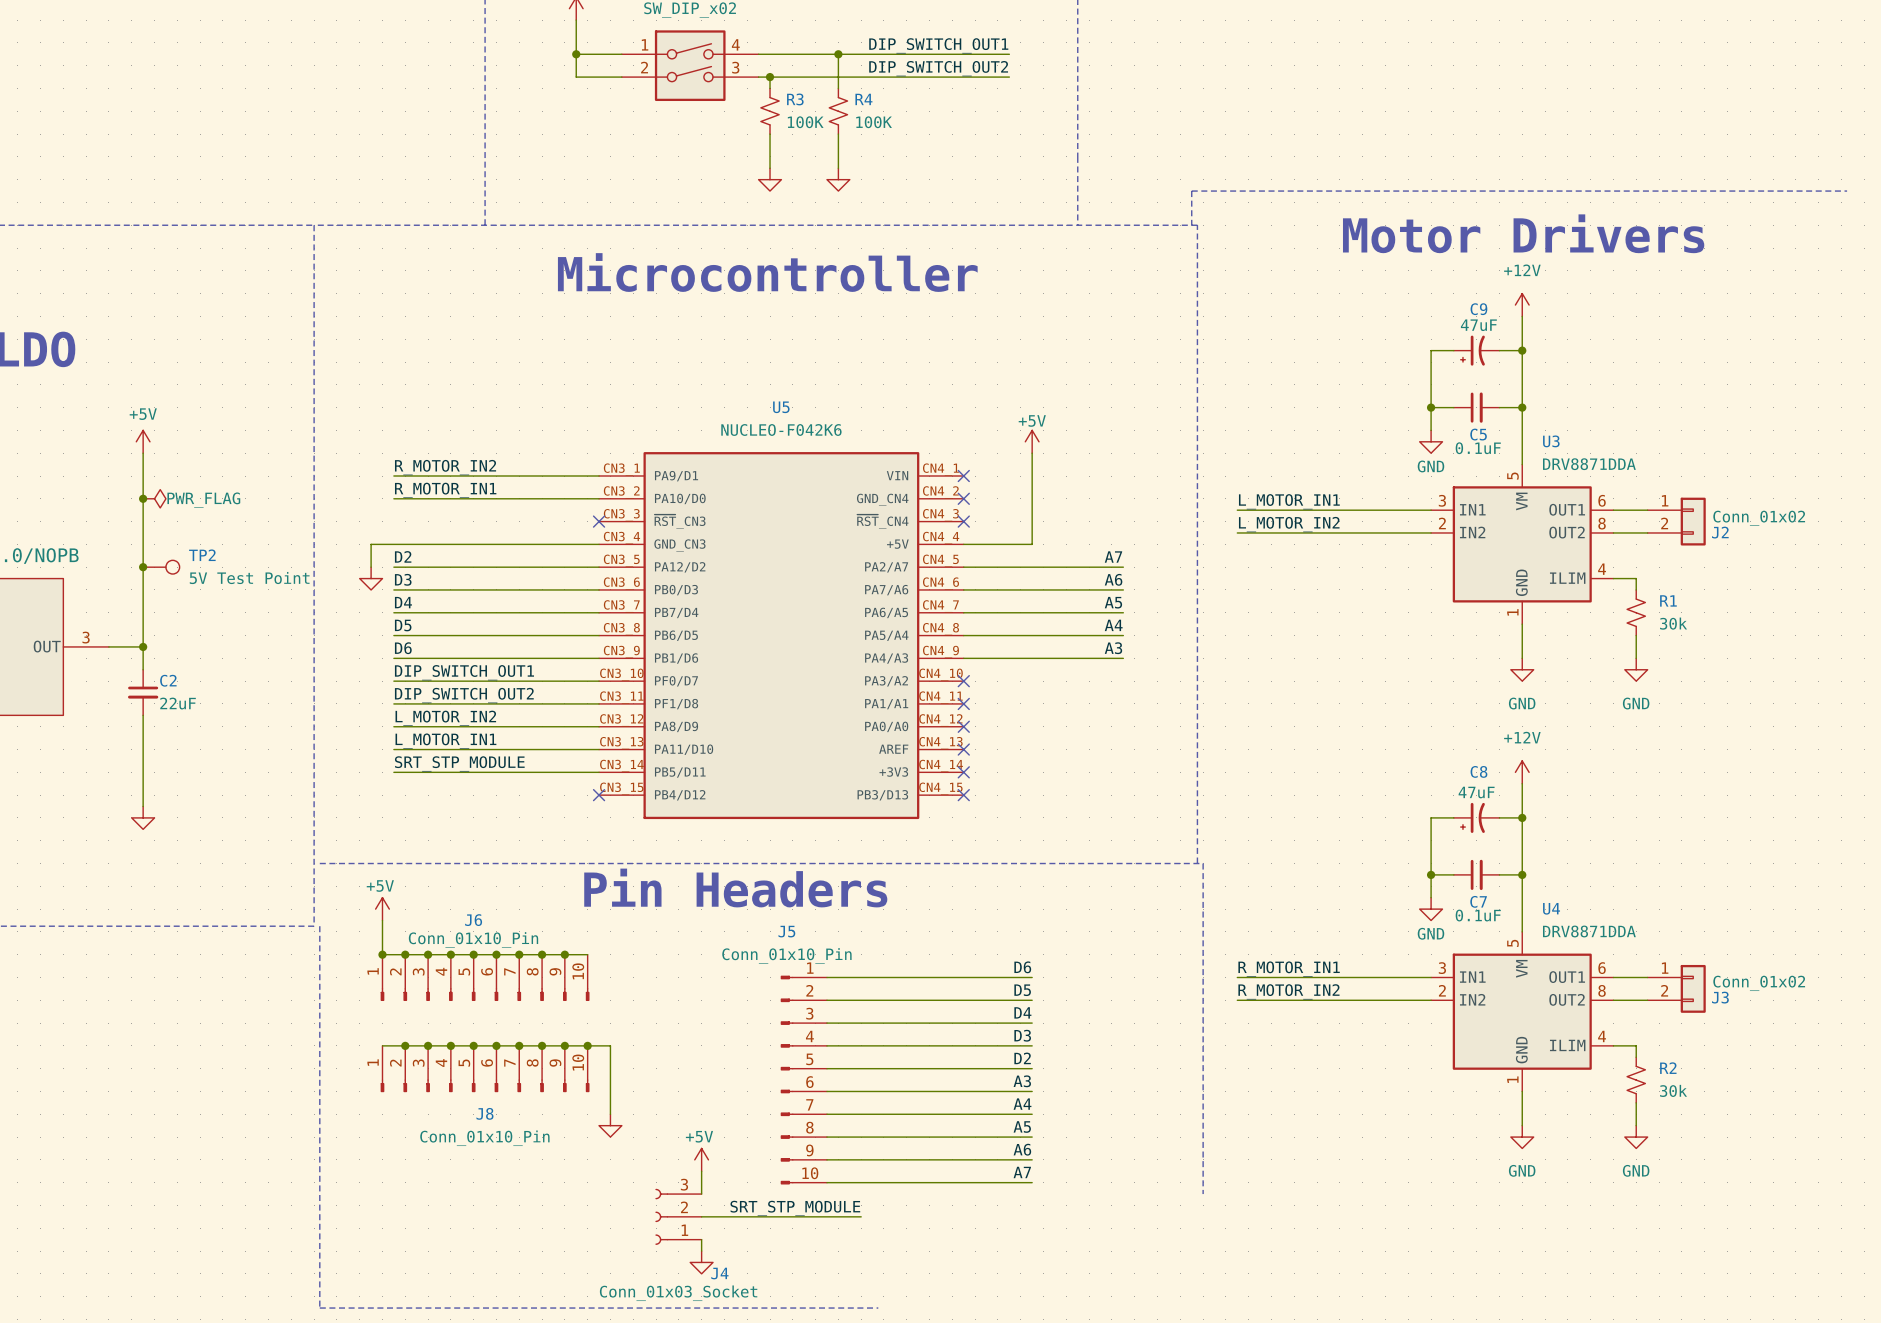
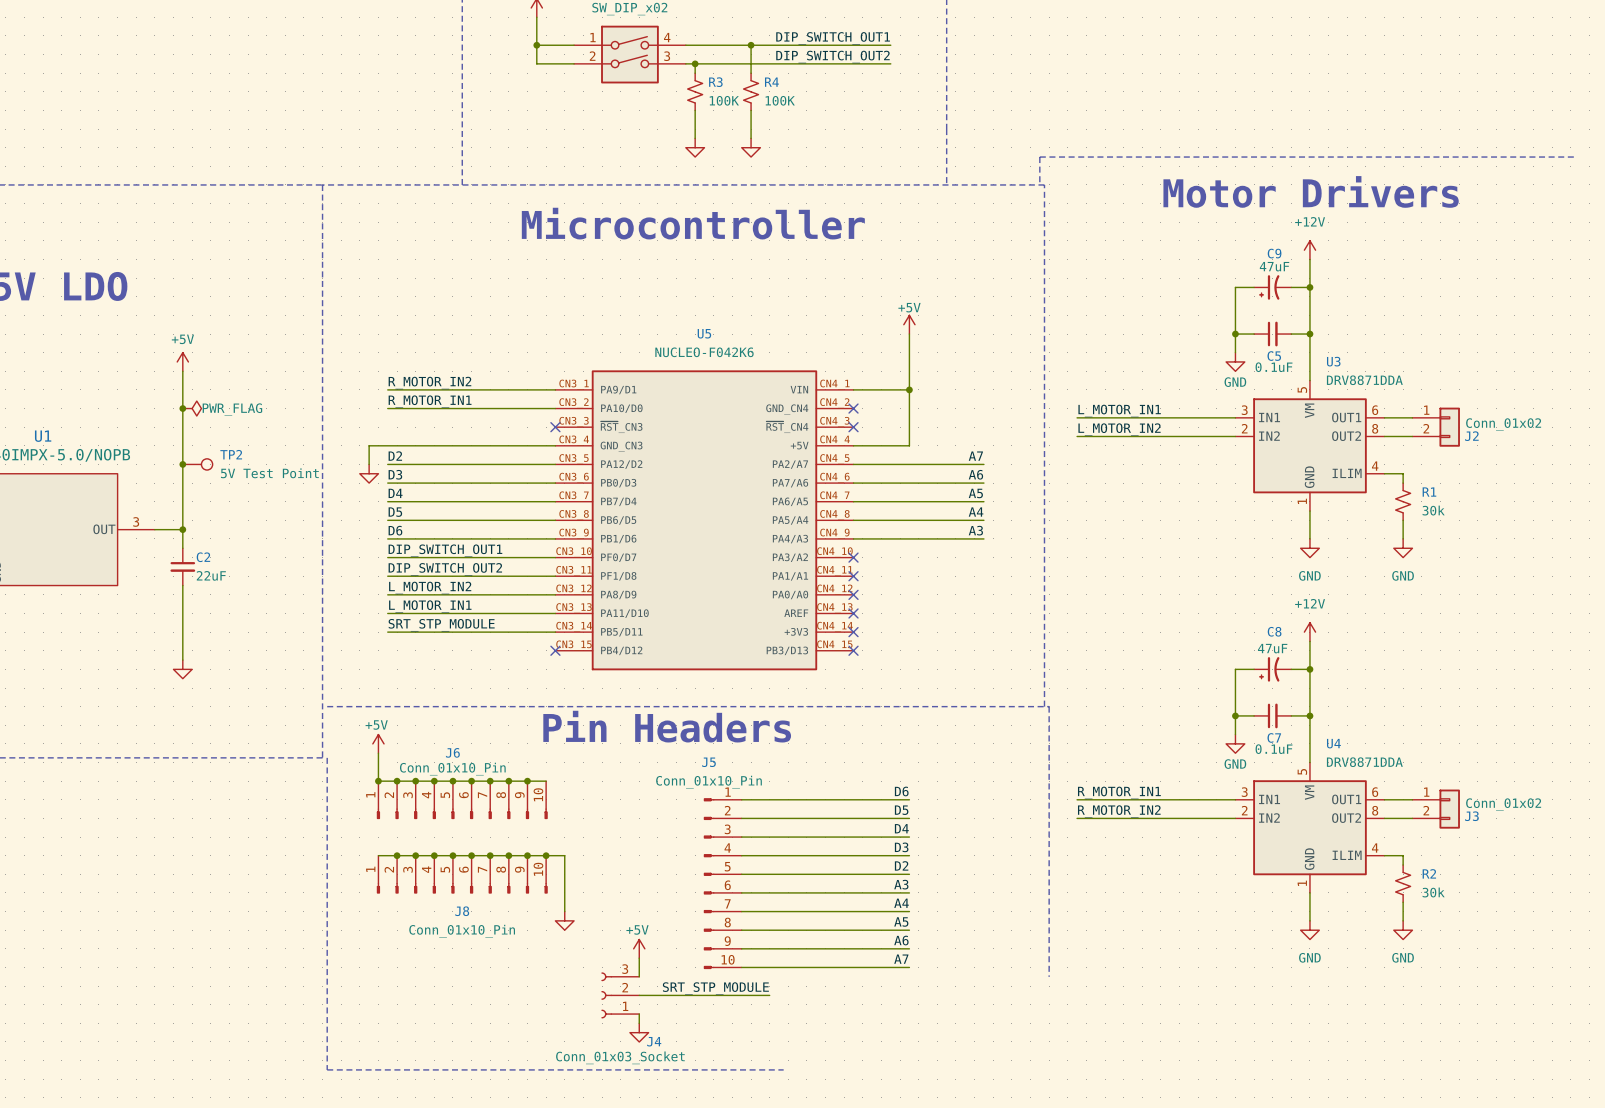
power symbol position: +5V (1032, 441) -> +5V (909, 324)
wire: none -> (853, 389) (909, 389)
no-connect mark: (963, 476) -> none
junction: none -> (909, 389)

